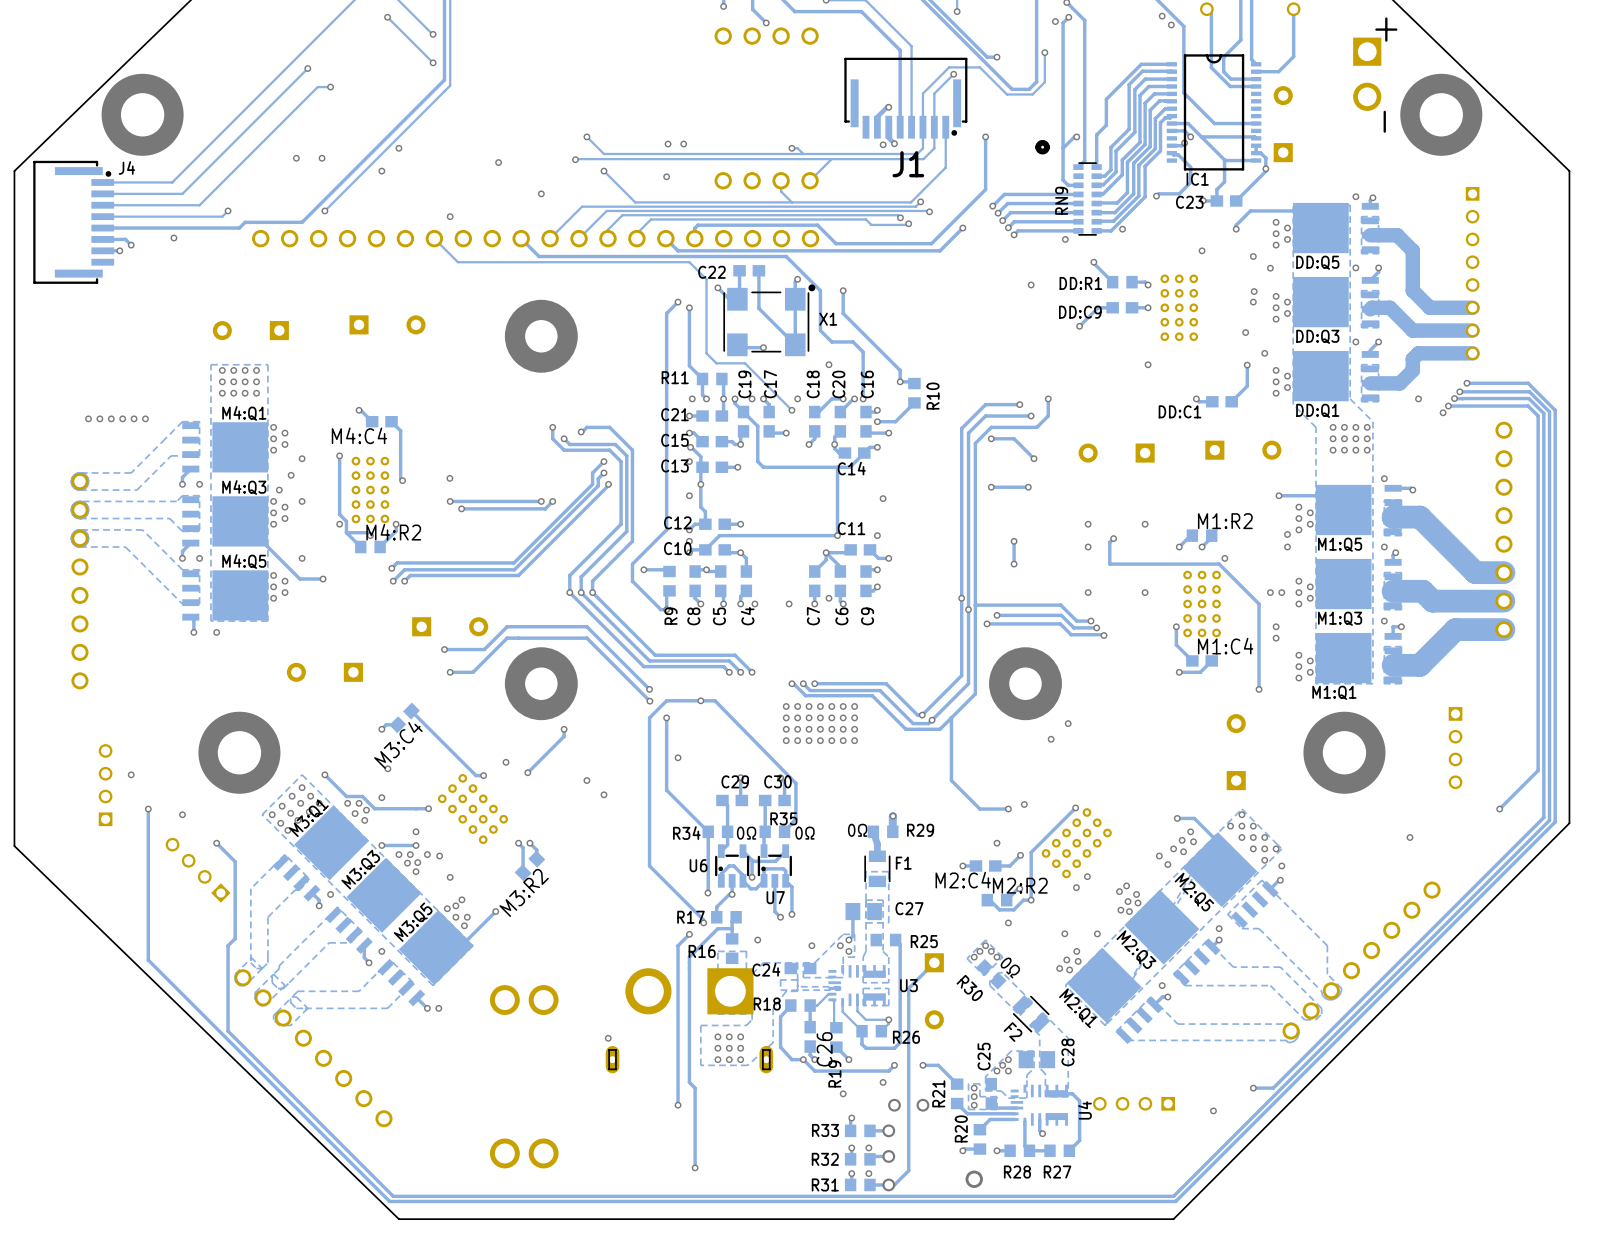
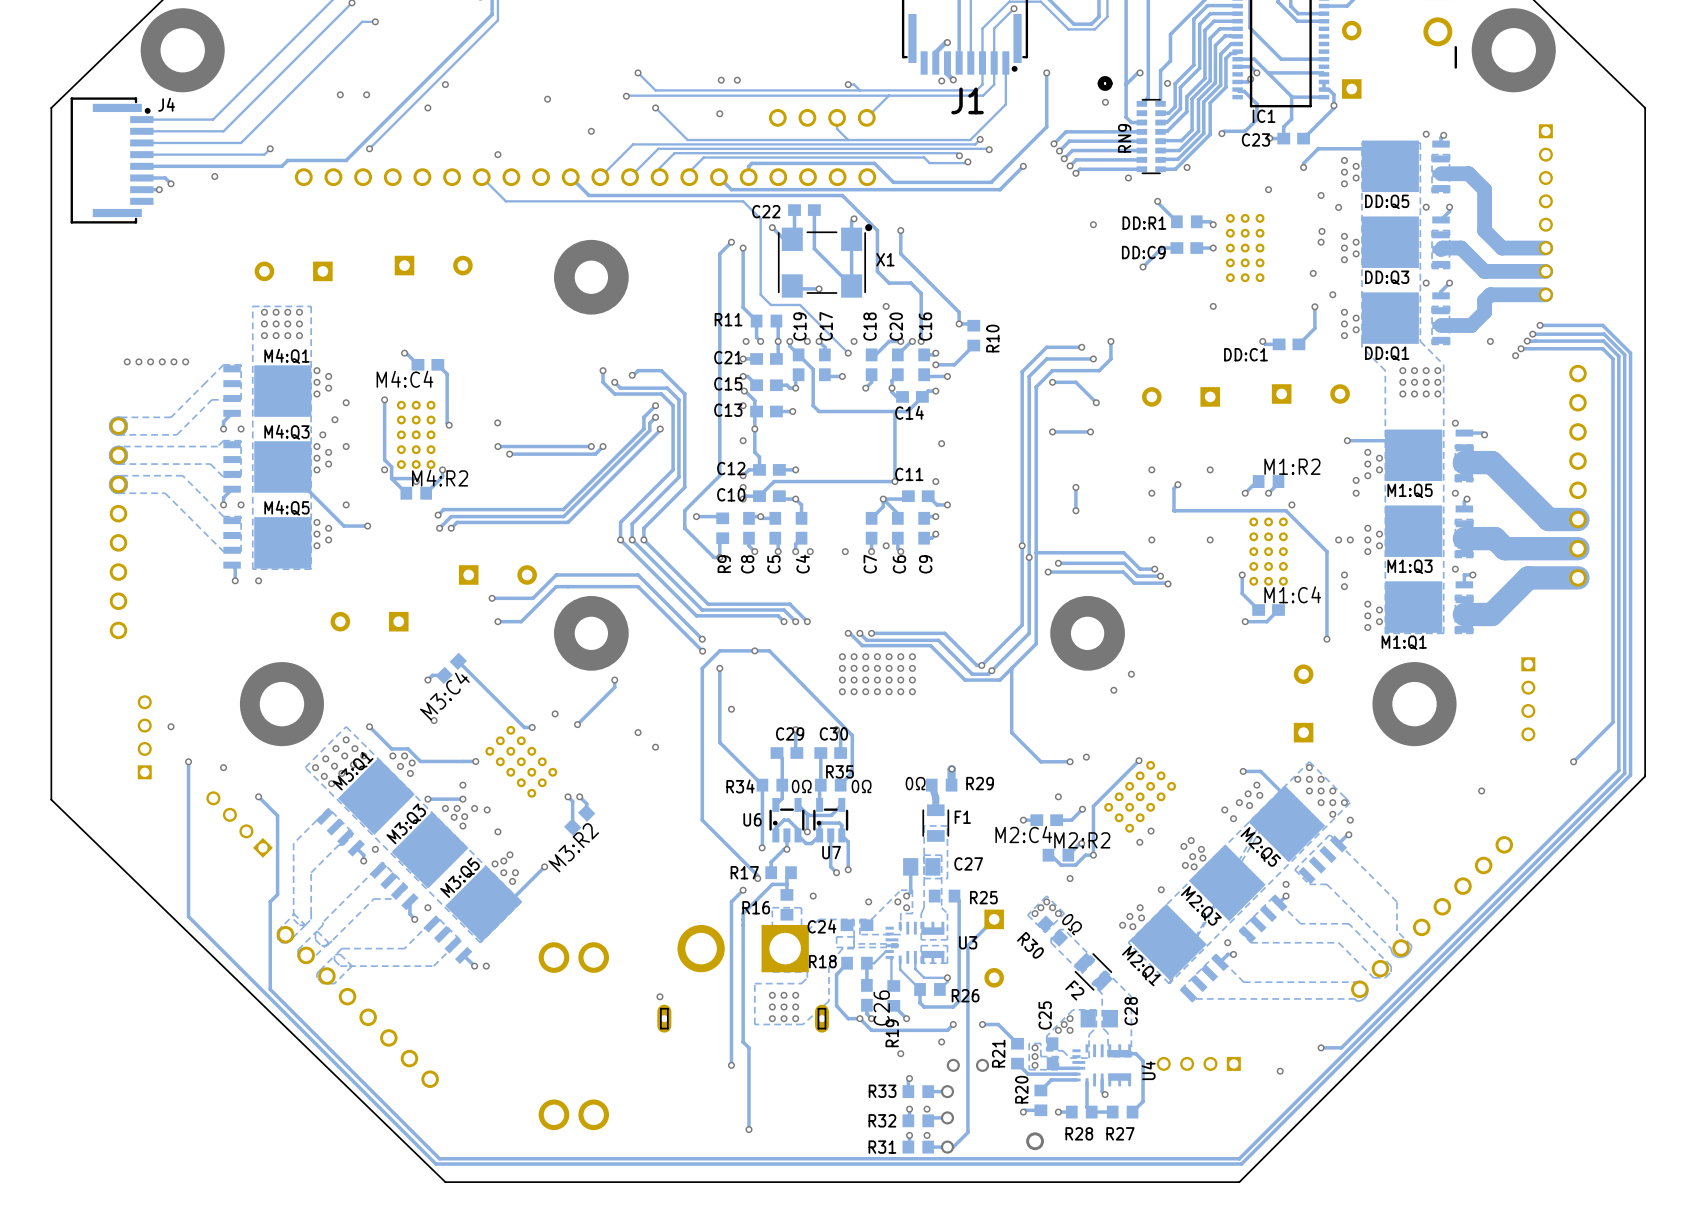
via: none -> (1167, 83)
via: none -> (1105, 102)
via: (381, 797) -> none
via: (1064, 933) -> none

